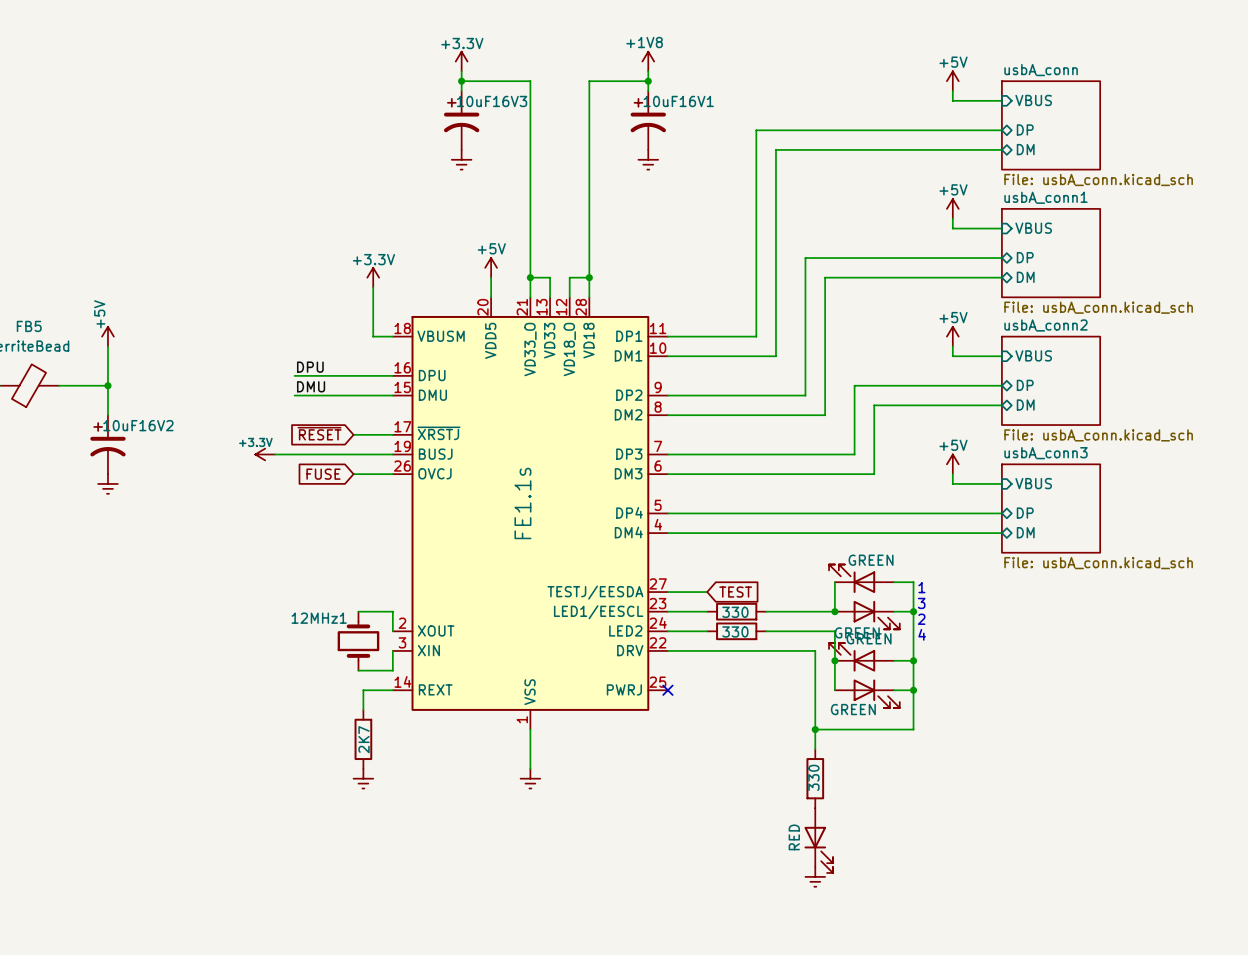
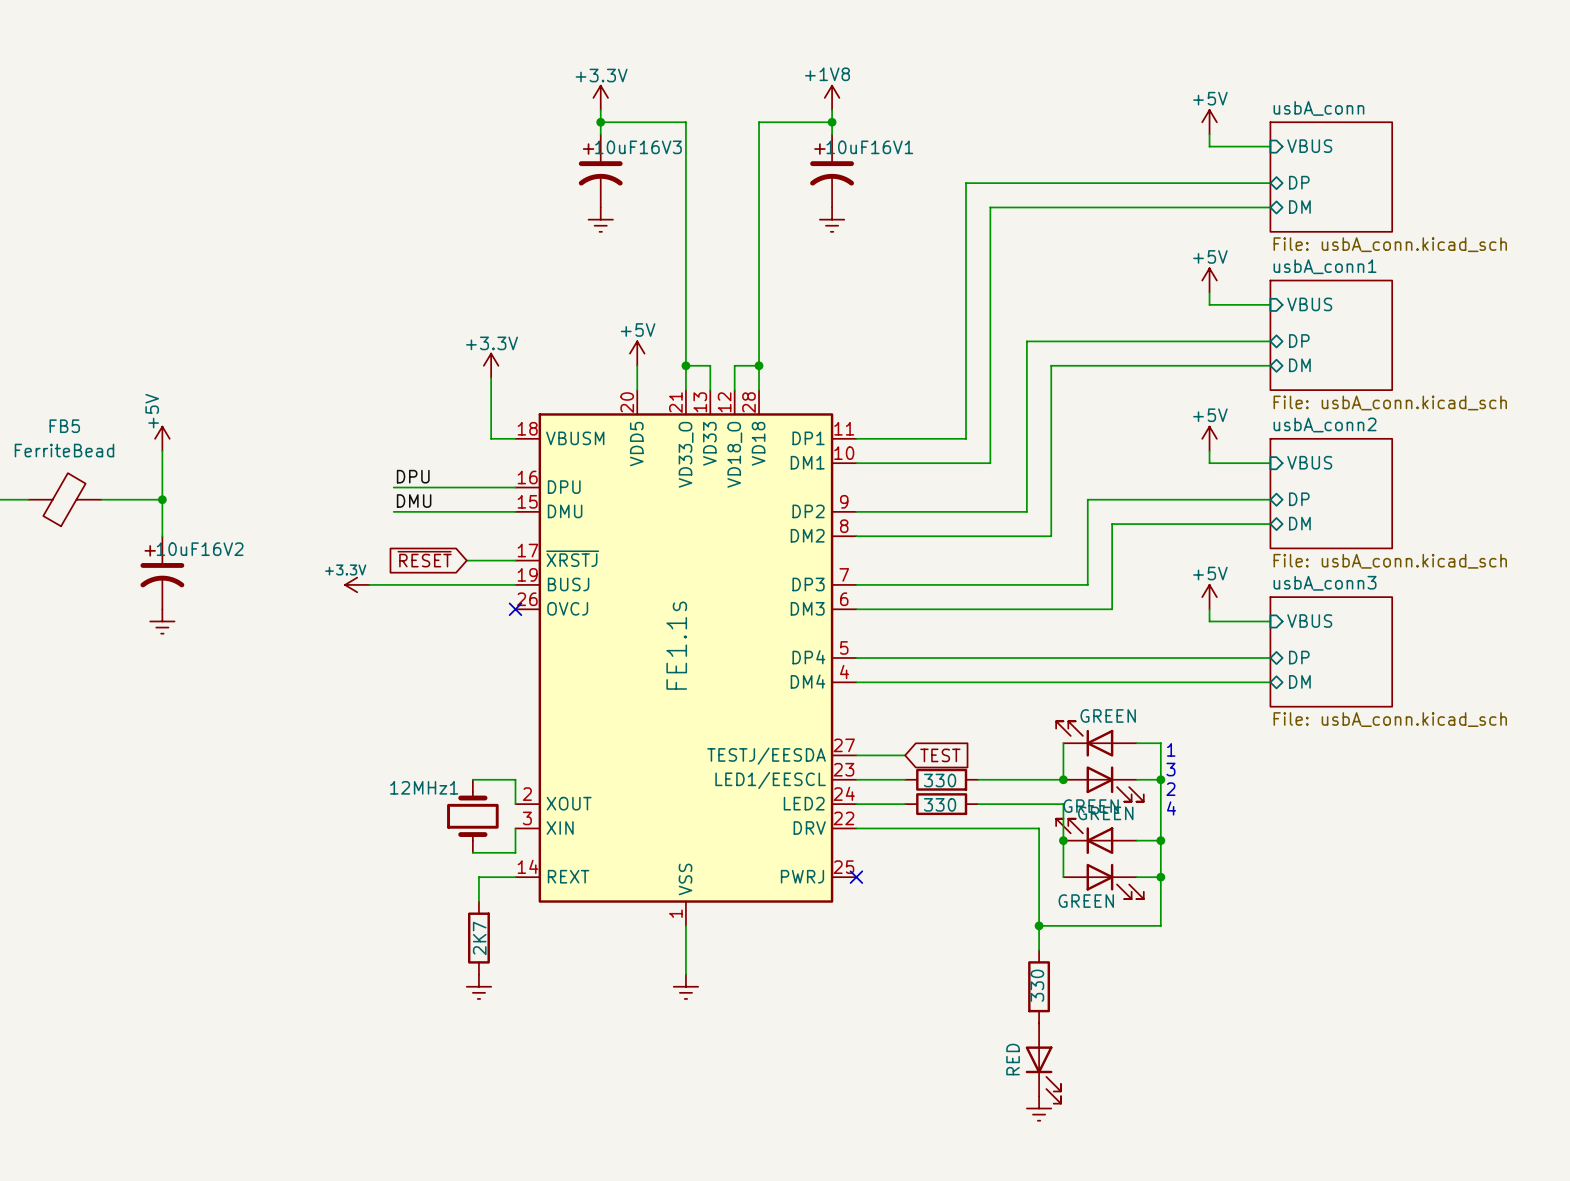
global label: FUSE (323, 474) -> none
wire: (353, 474) (392, 474) -> none
no-connect mark: none -> (515, 609)

